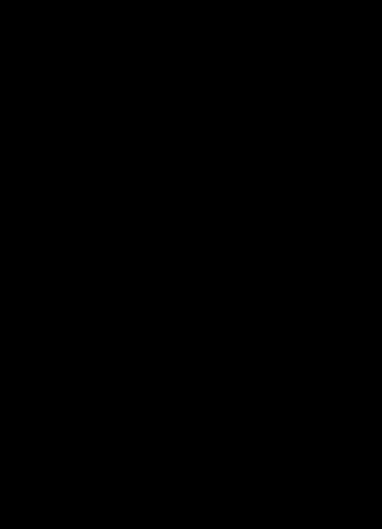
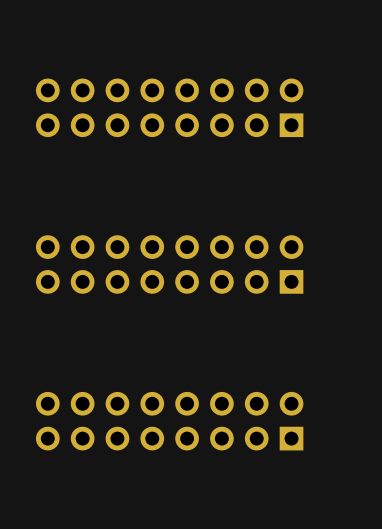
part: none -> (169, 107)
part: none -> (169, 264)
part: none -> (169, 421)

